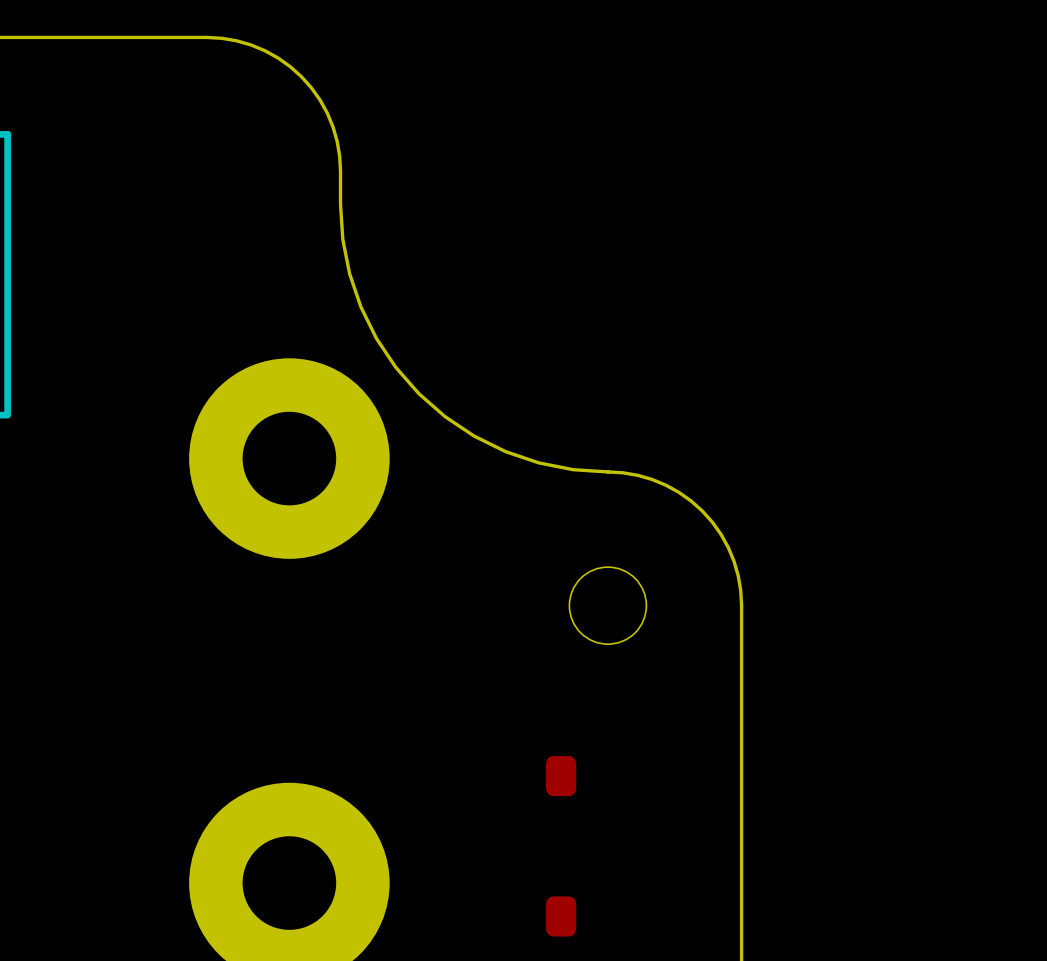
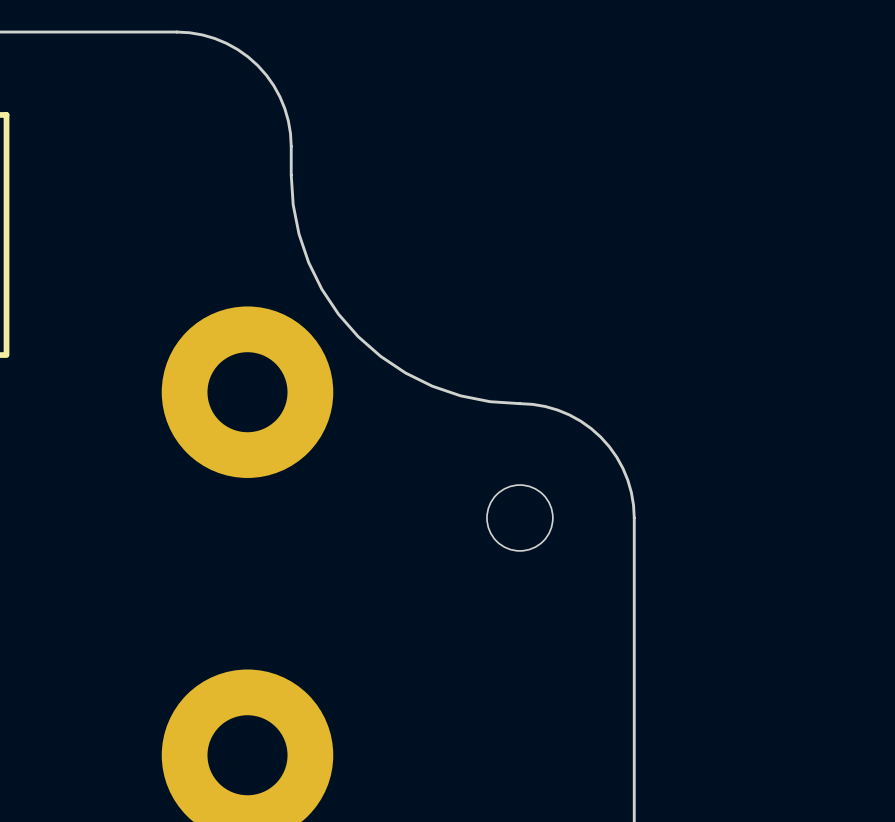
part: (561, 846) -> none

